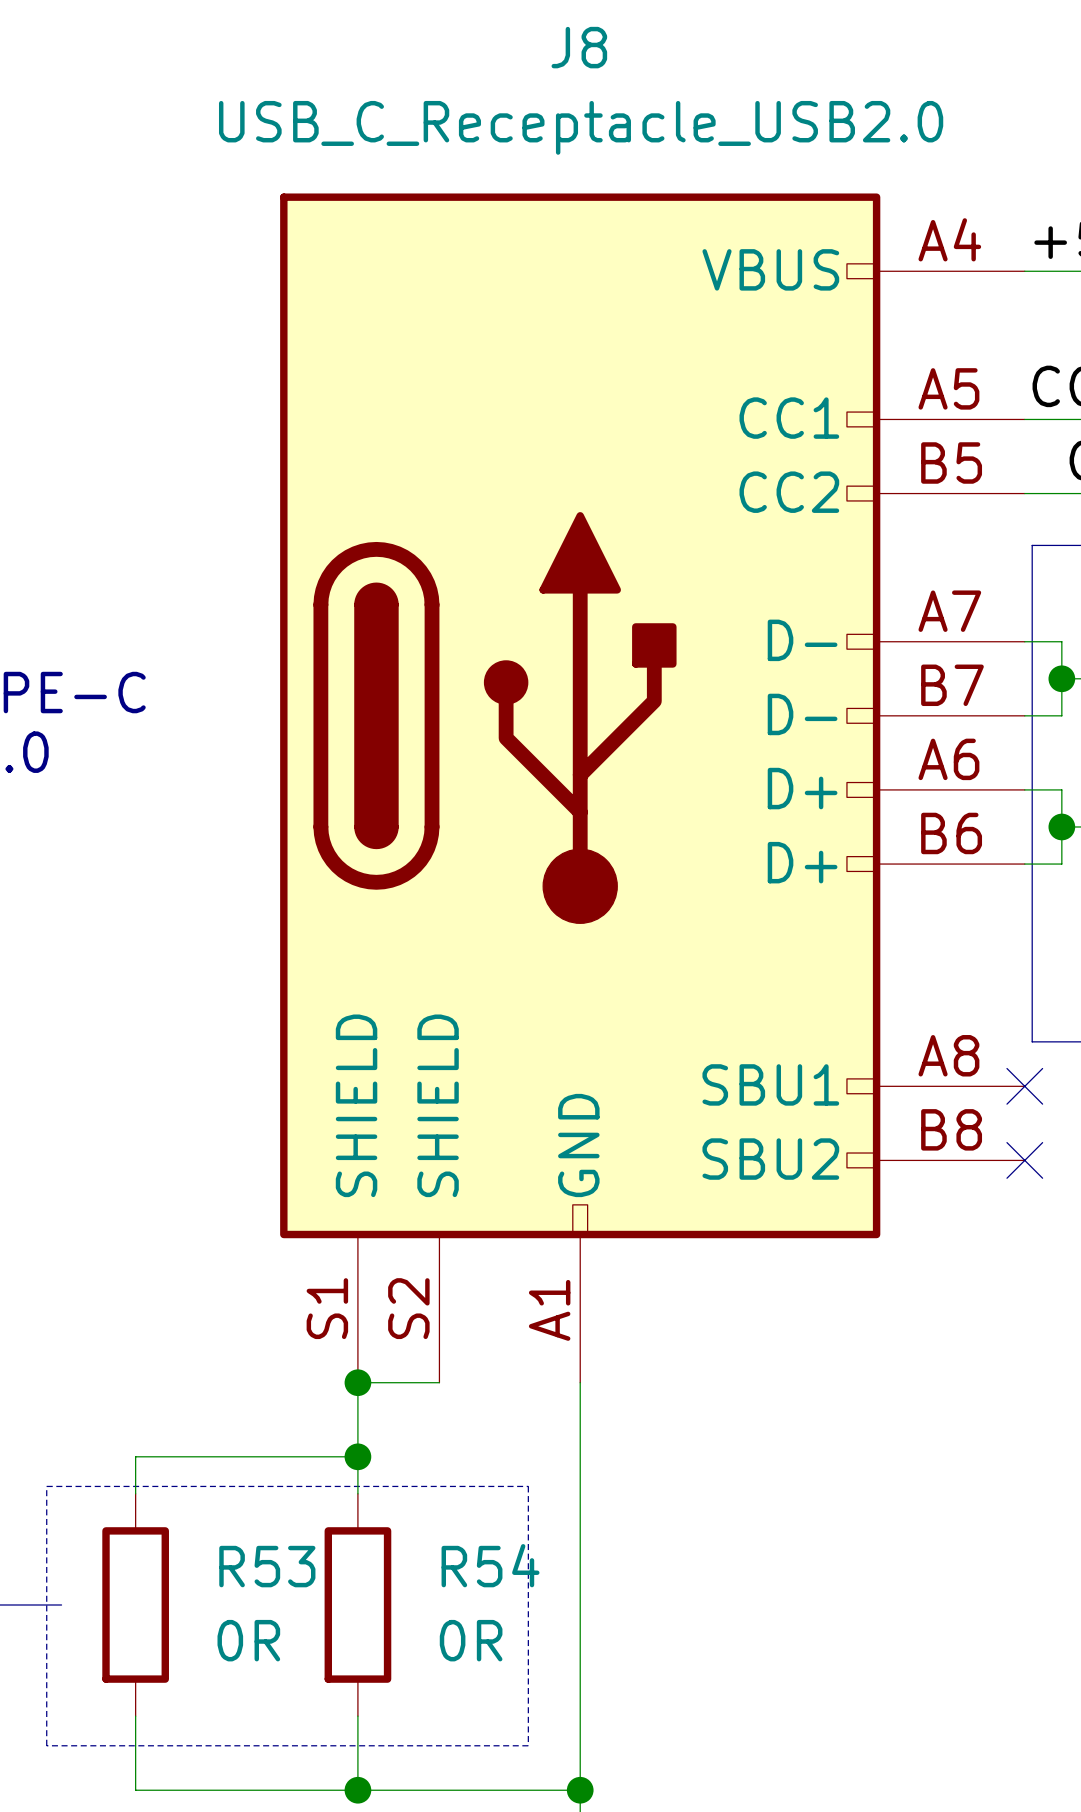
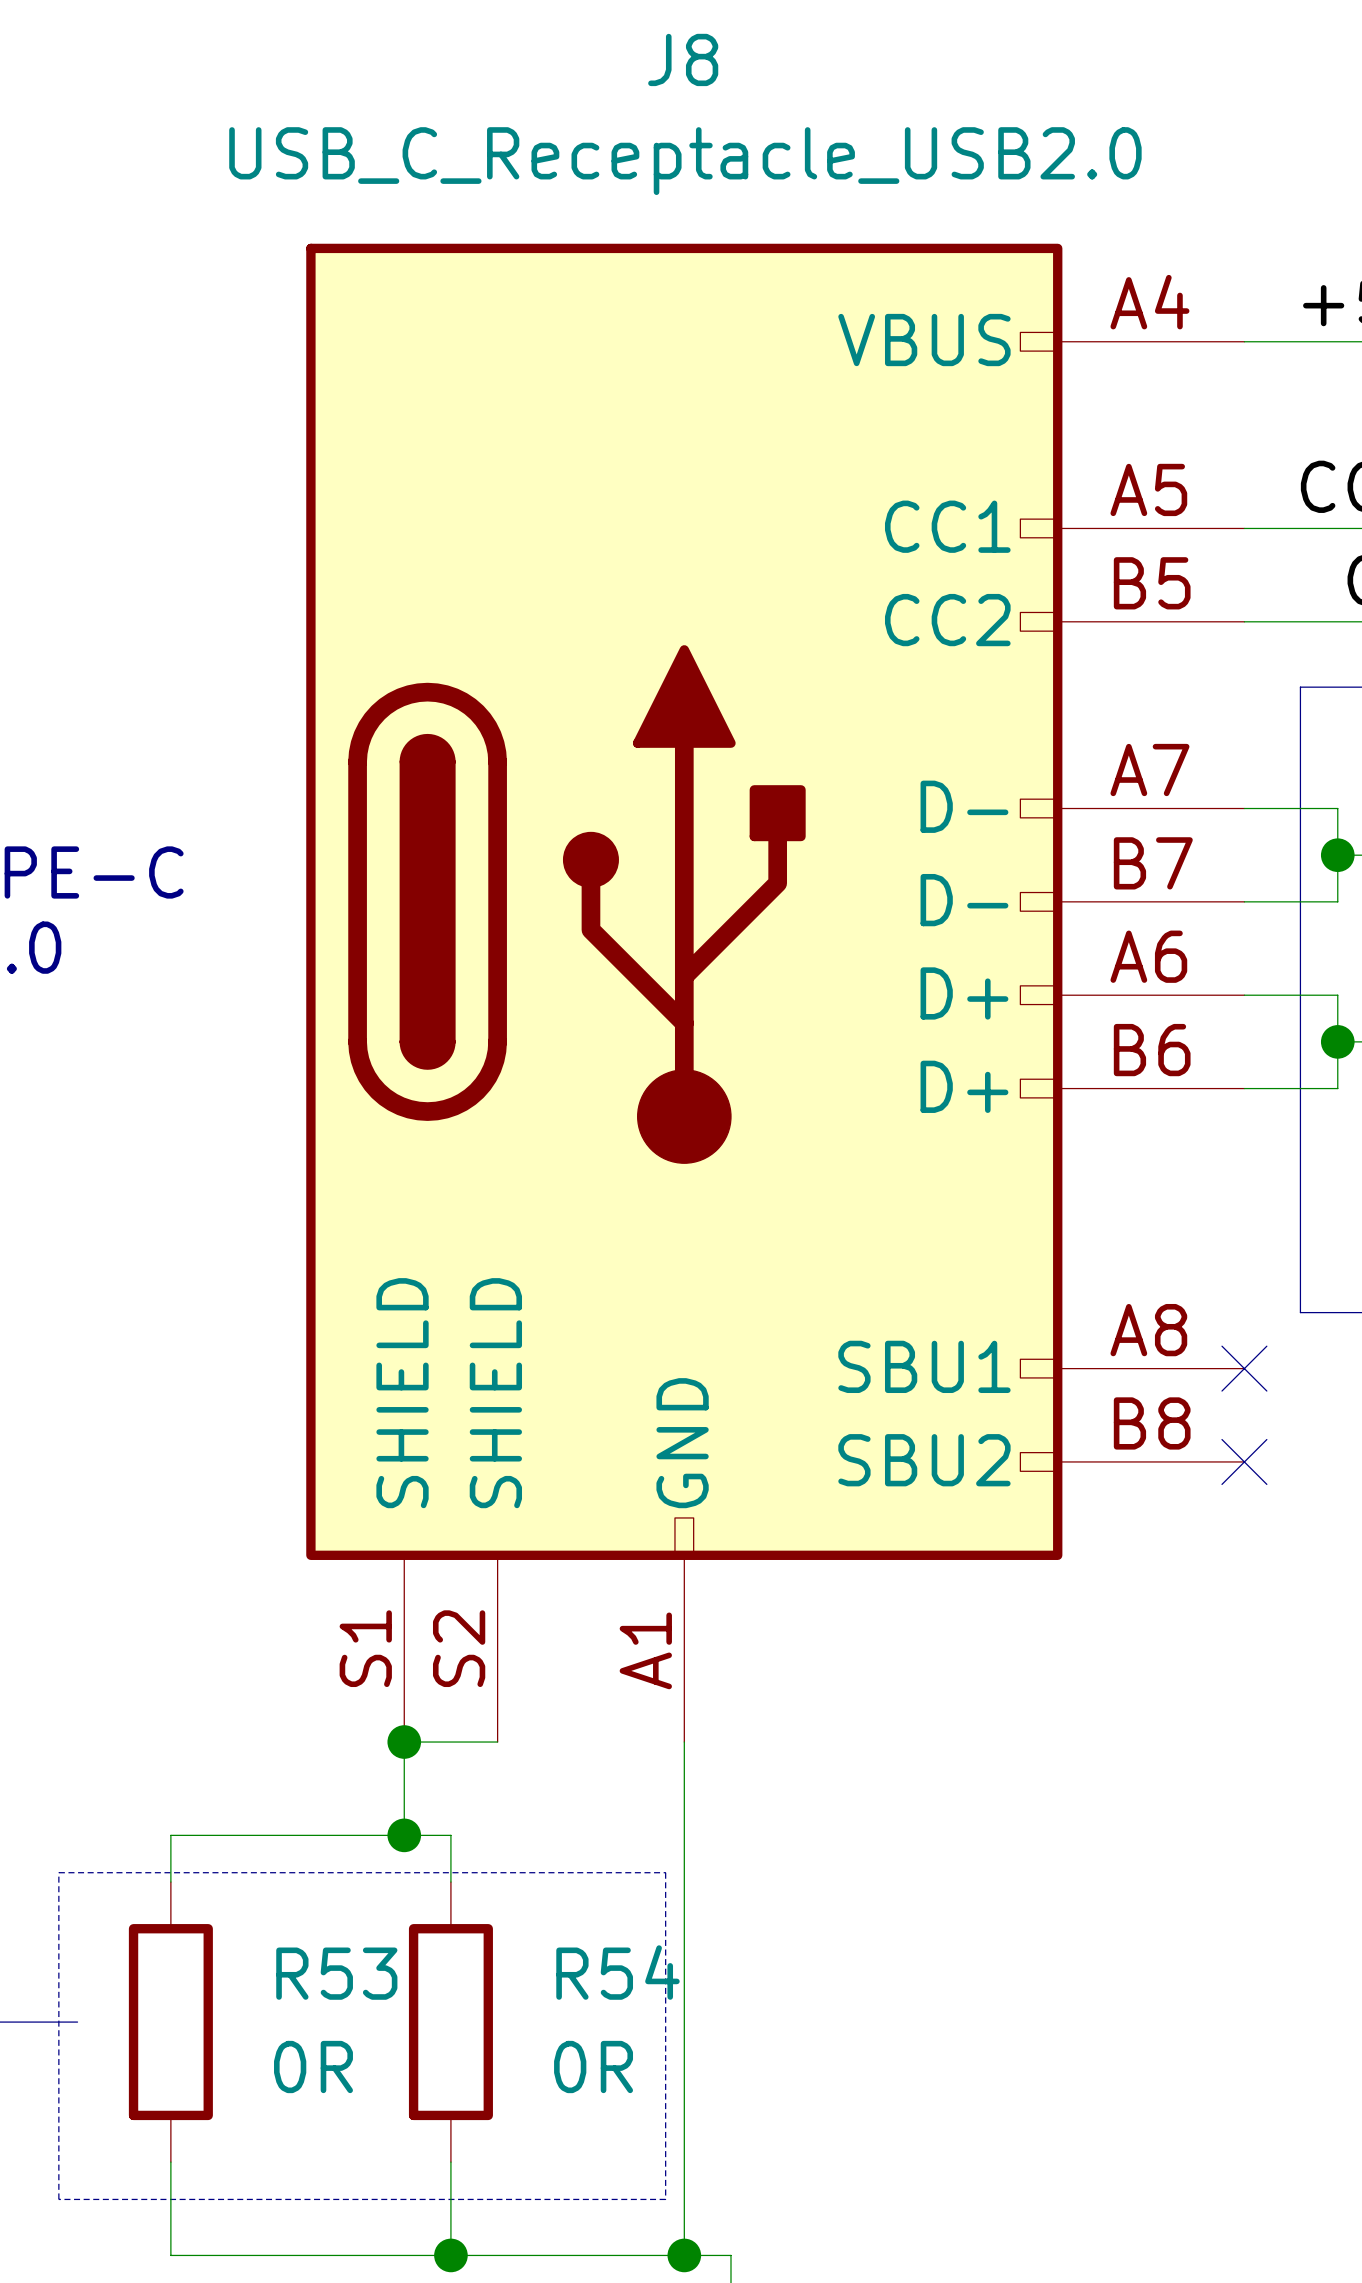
J8 symbol: [280, 193, 1025, 1383] -> [306, 243, 1245, 1743]
no-connect mark position: (1024, 1086) -> (1244, 1368)
no-connect mark position: (1024, 1160) -> (1244, 1461)
wire: (357, 1382) (357, 1456) -> (450, 1742) (404, 1742) (404, 1835)
junction position: (357, 1382) -> (404, 1742)
wire: (394, 1382) (439, 1382) -> none
wire: (580, 1382) (580, 1790) -> (684, 1742) (684, 2255)
junction position: (357, 1456) -> (404, 1835)
junction position: (580, 1790) -> (684, 2255)

